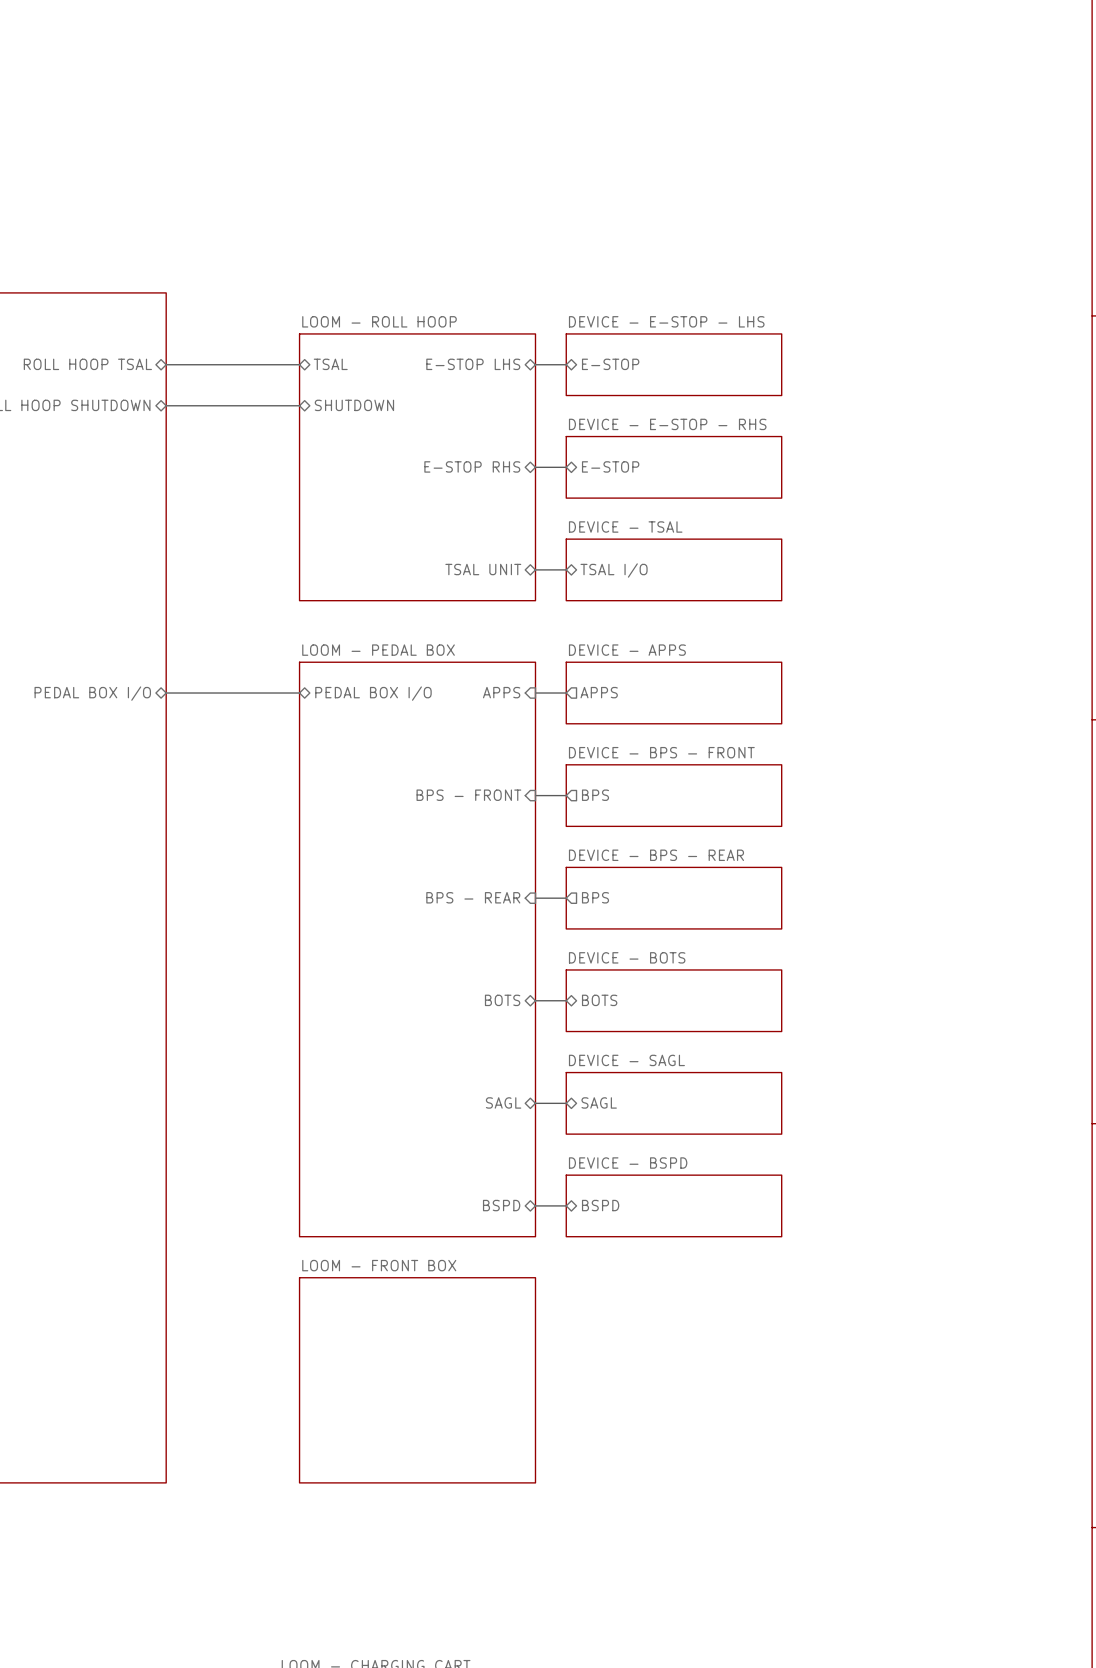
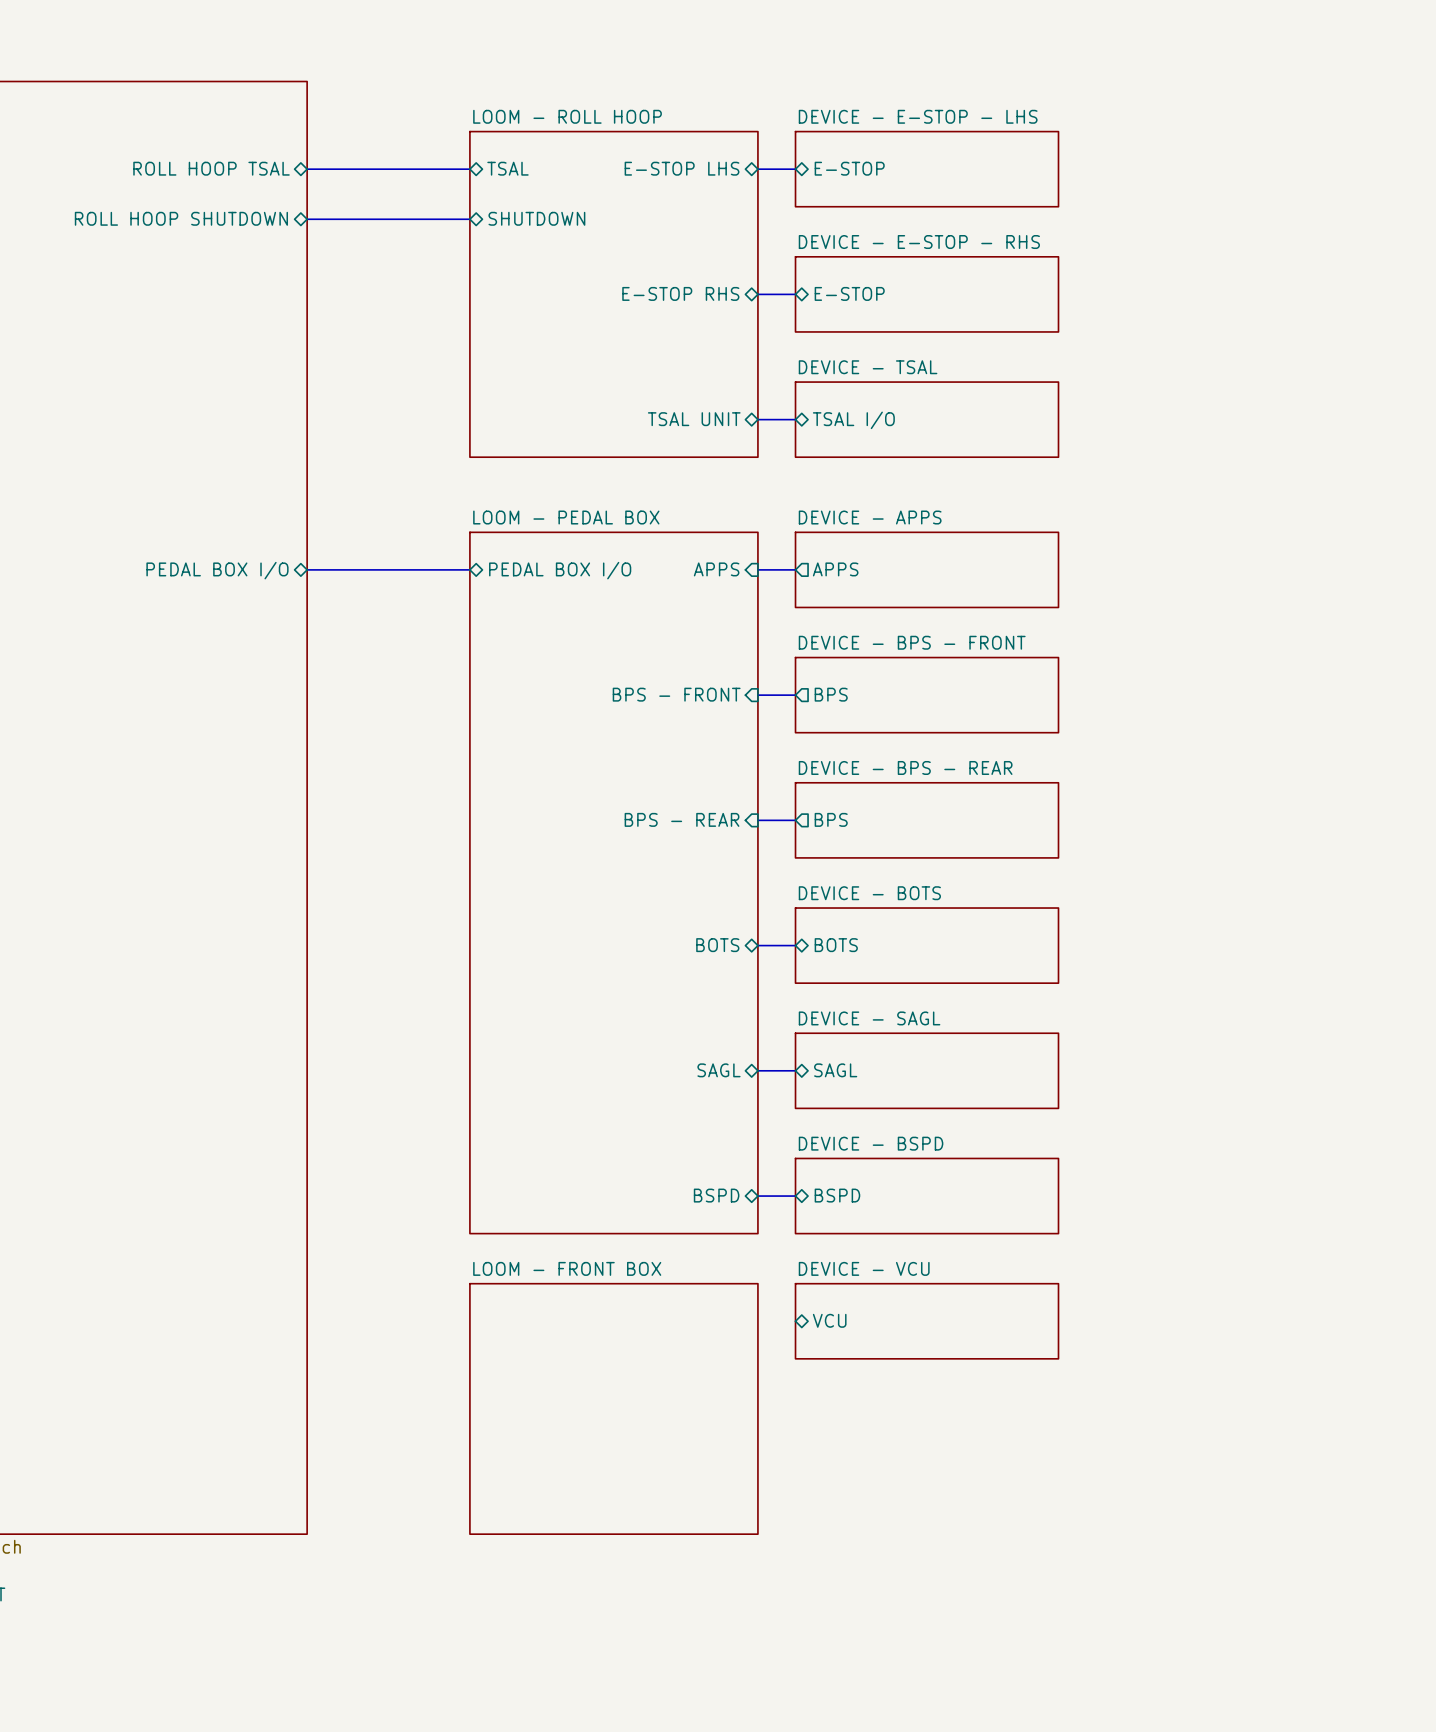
sheet pin: none -> VCU (829, 1320)
sheet DEVICE - VCU: none -> (927, 1321)

